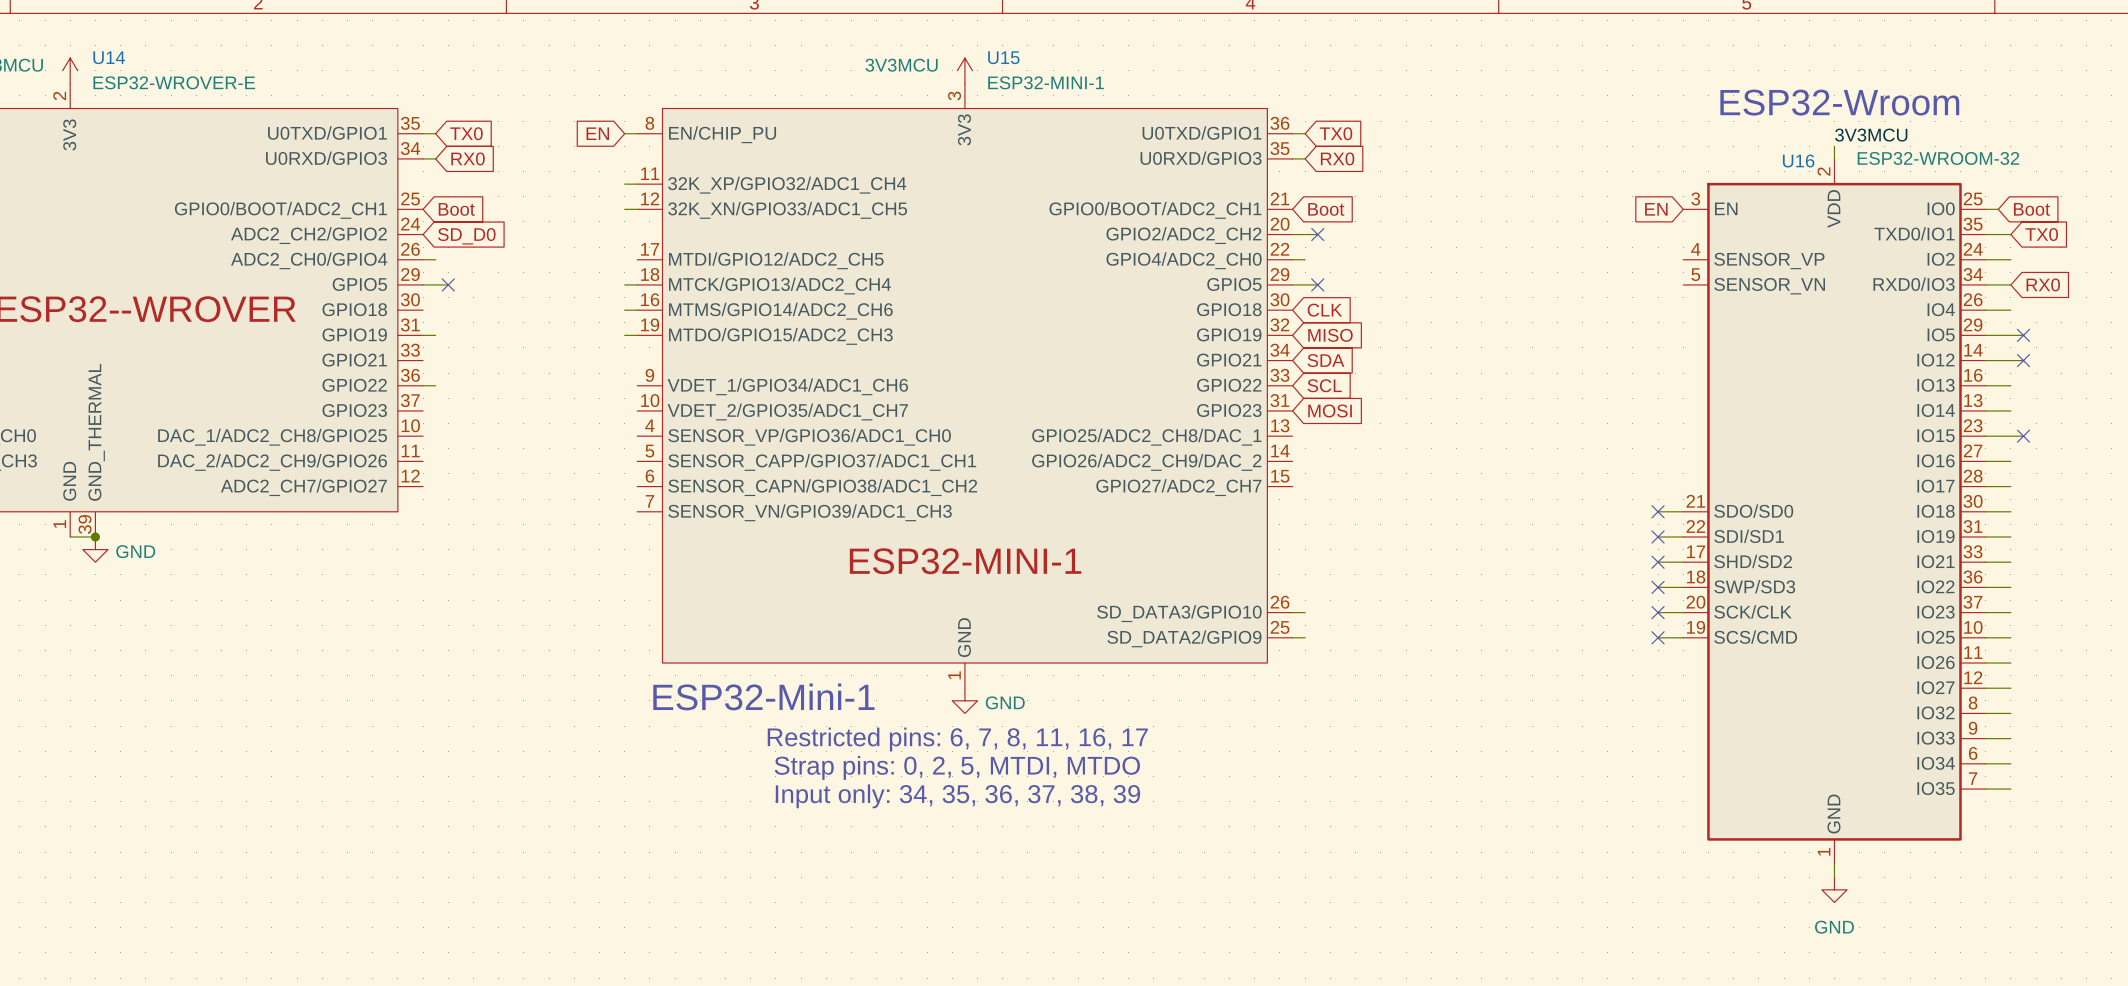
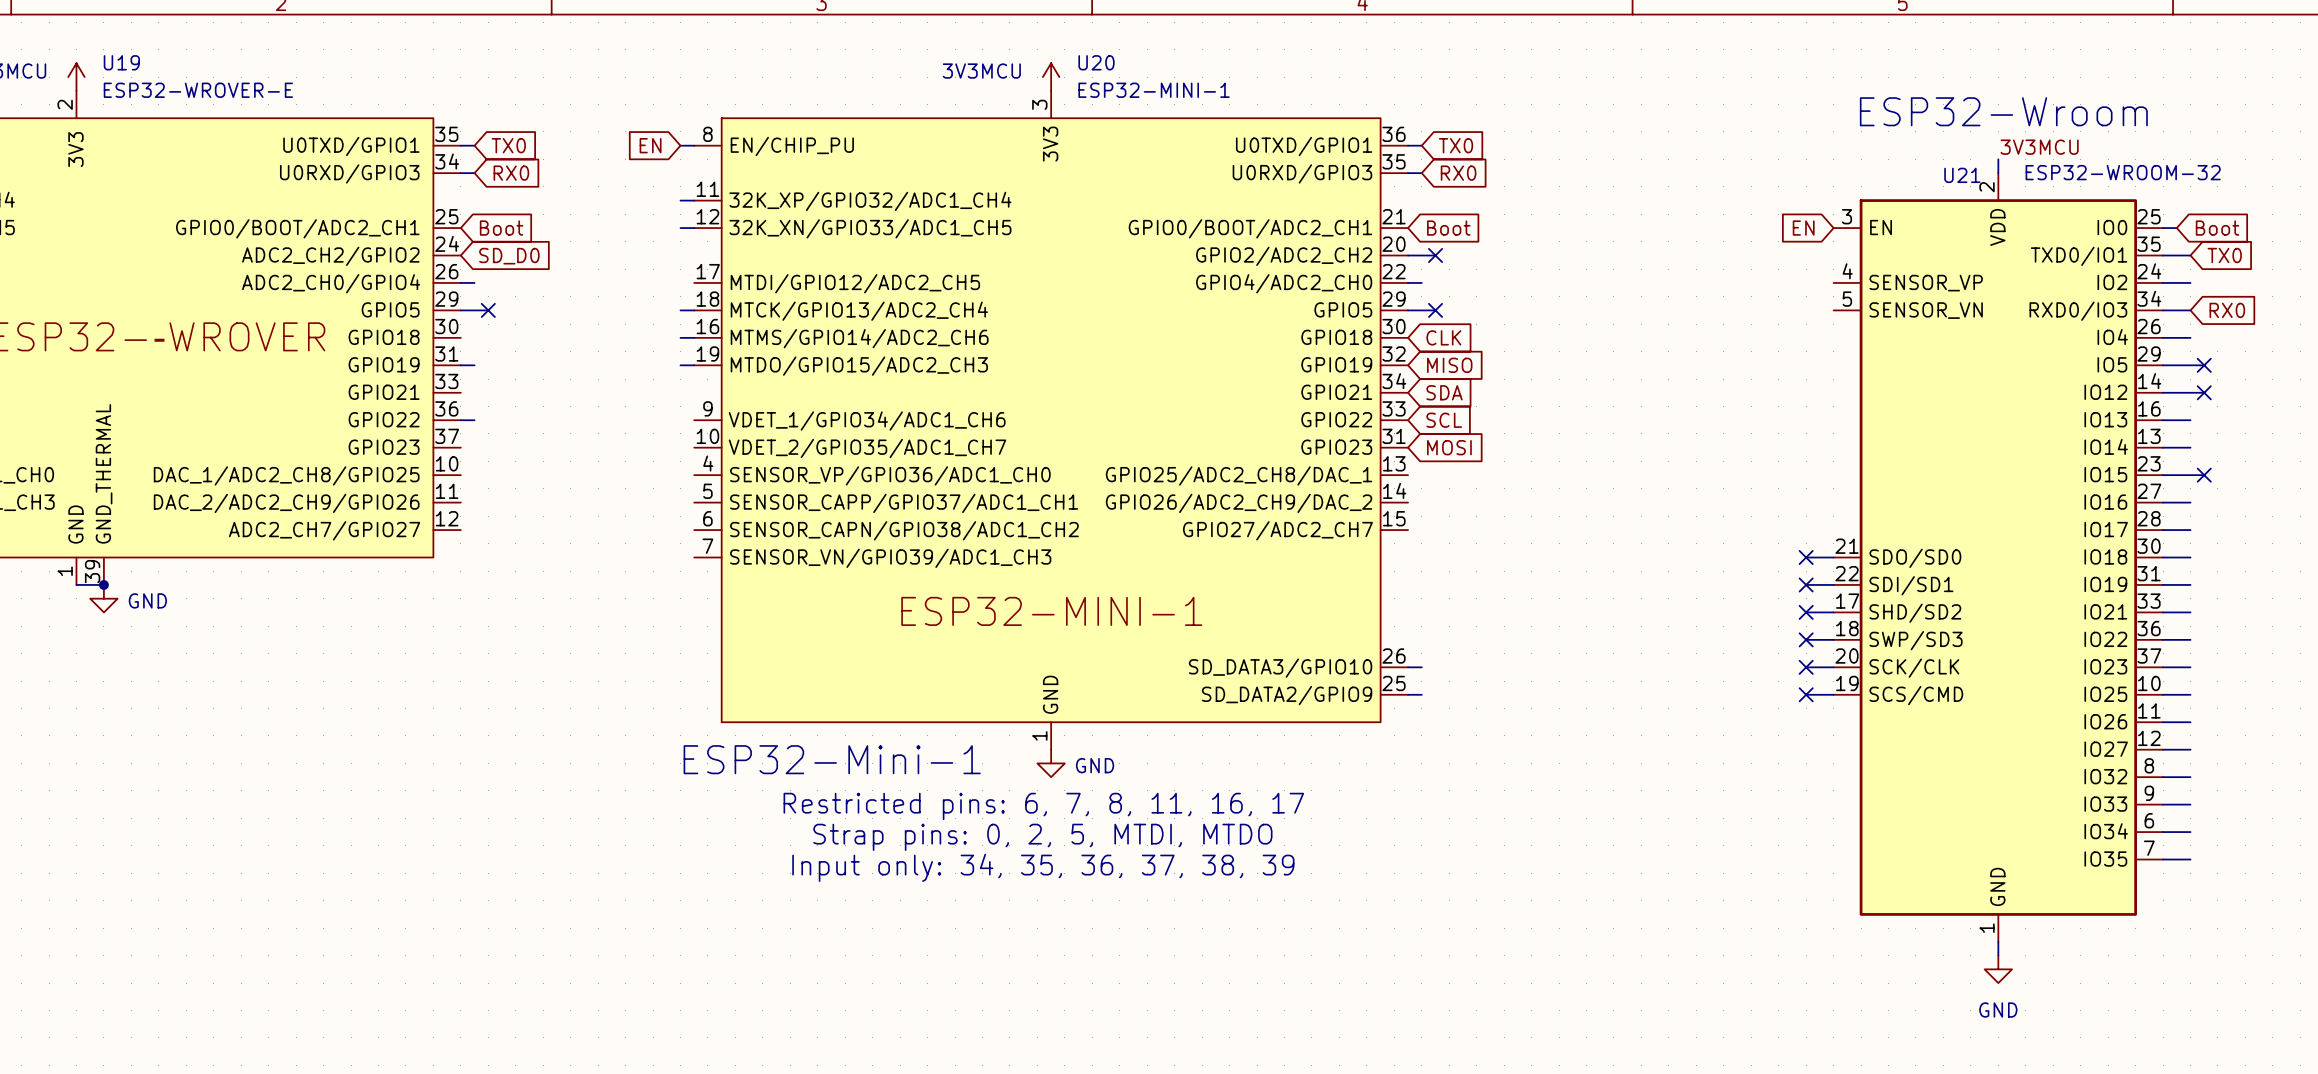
U14 name: U14 (109, 57) -> U19 (121, 62)
U15 name: U15 (1003, 57) -> U20 (1096, 62)
U16 name: U16 (1798, 160) -> U21 (1962, 175)

